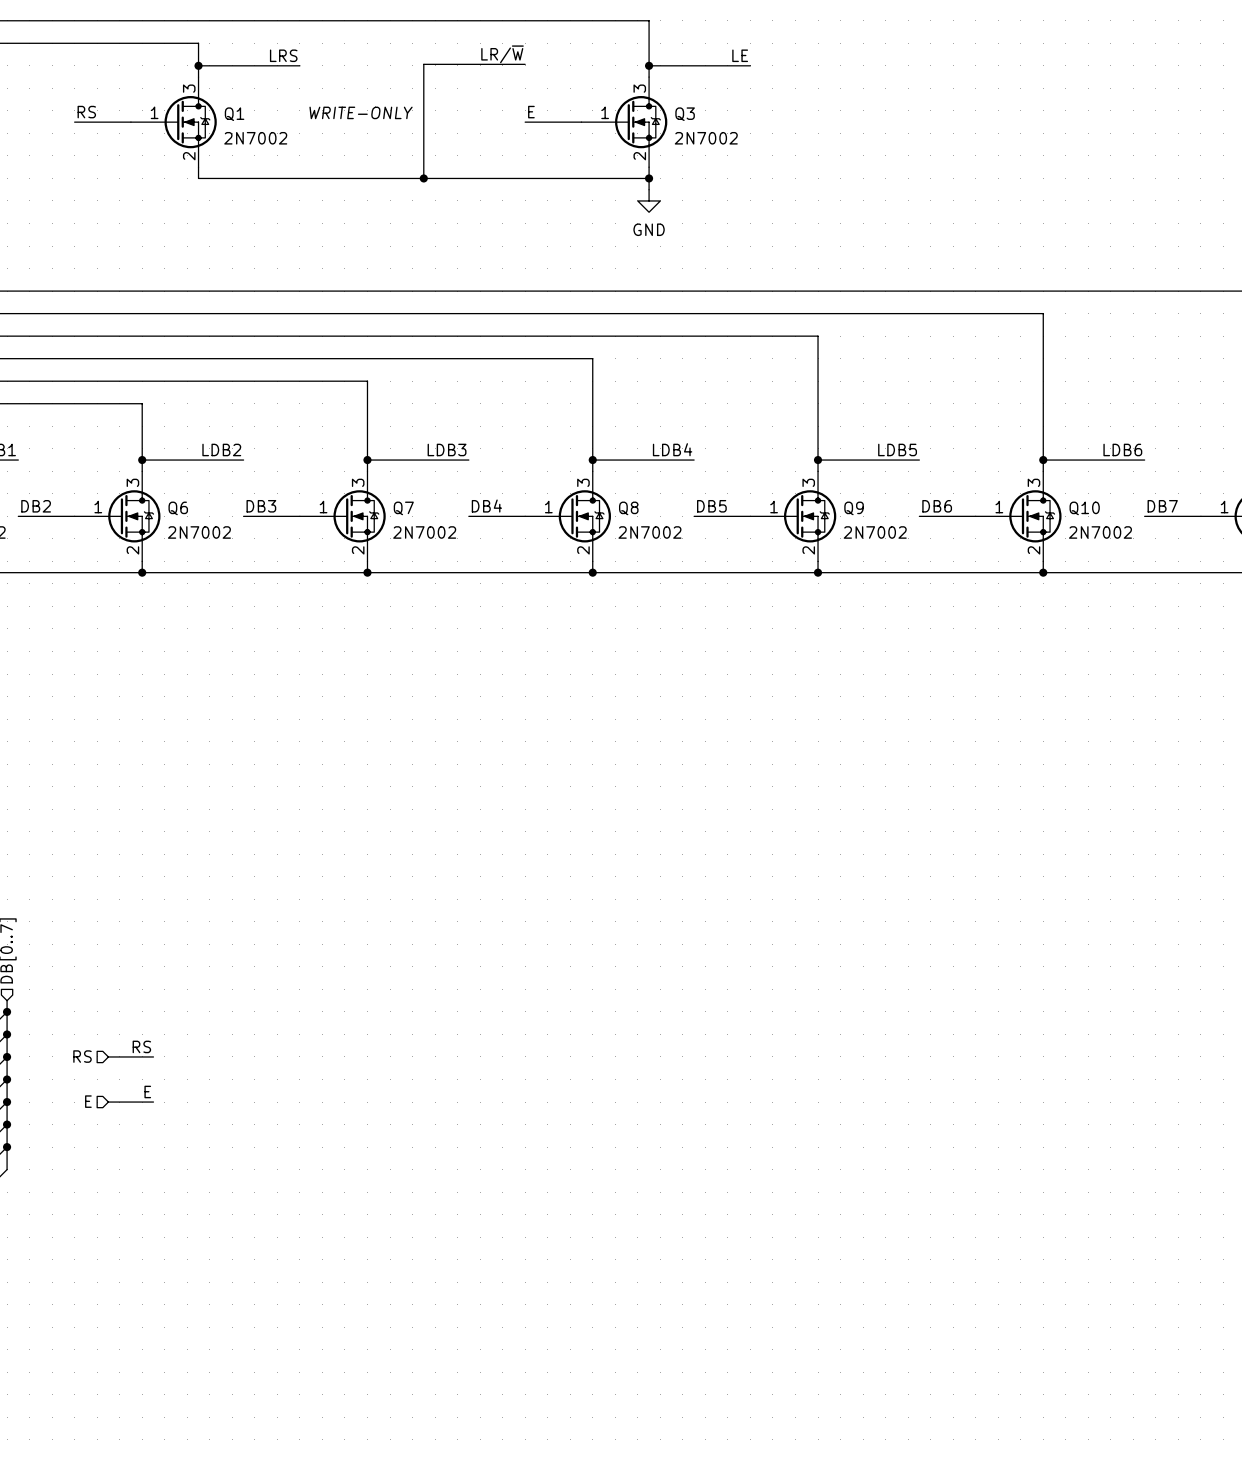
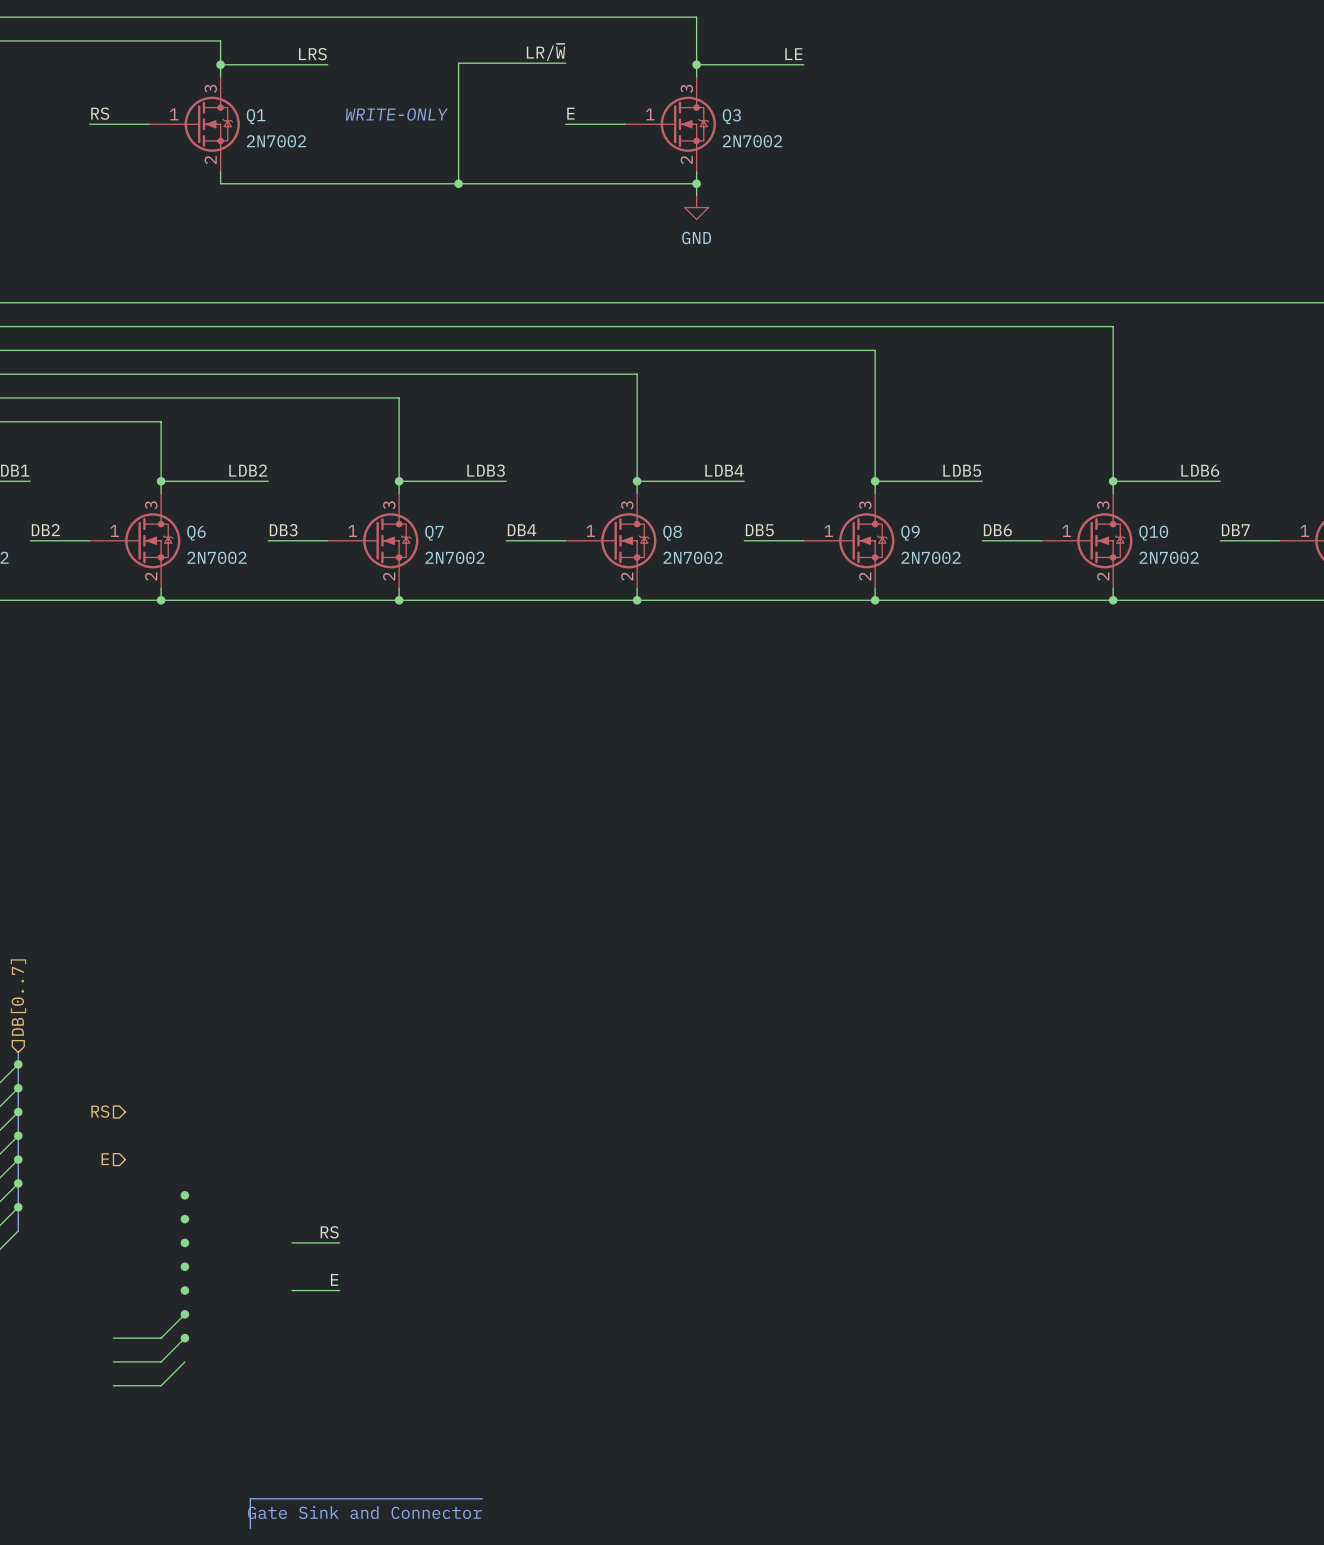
label position: RS (141, 1046) -> RS (329, 1232)
wire: (108, 1056) (153, 1056) -> (292, 1242) (339, 1242)
label position: E (147, 1091) -> E (334, 1279)
wire: (108, 1102) (153, 1102) -> (292, 1290) (339, 1290)
junction: none -> (184, 1195)
junction: none -> (184, 1219)
junction: none -> (184, 1242)
junction: none -> (184, 1266)
junction: none -> (184, 1290)
wire: none -> (184, 1314) (161, 1338) (113, 1338)
junction: none -> (184, 1314)
wire: none -> (184, 1338) (161, 1361) (113, 1361)
junction: none -> (184, 1338)
wire: none -> (184, 1361) (161, 1385) (113, 1385)
line: none -> (482, 1498) (250, 1498) (250, 1528)
text: none -> Gate Sink and Connector (364, 1512)

